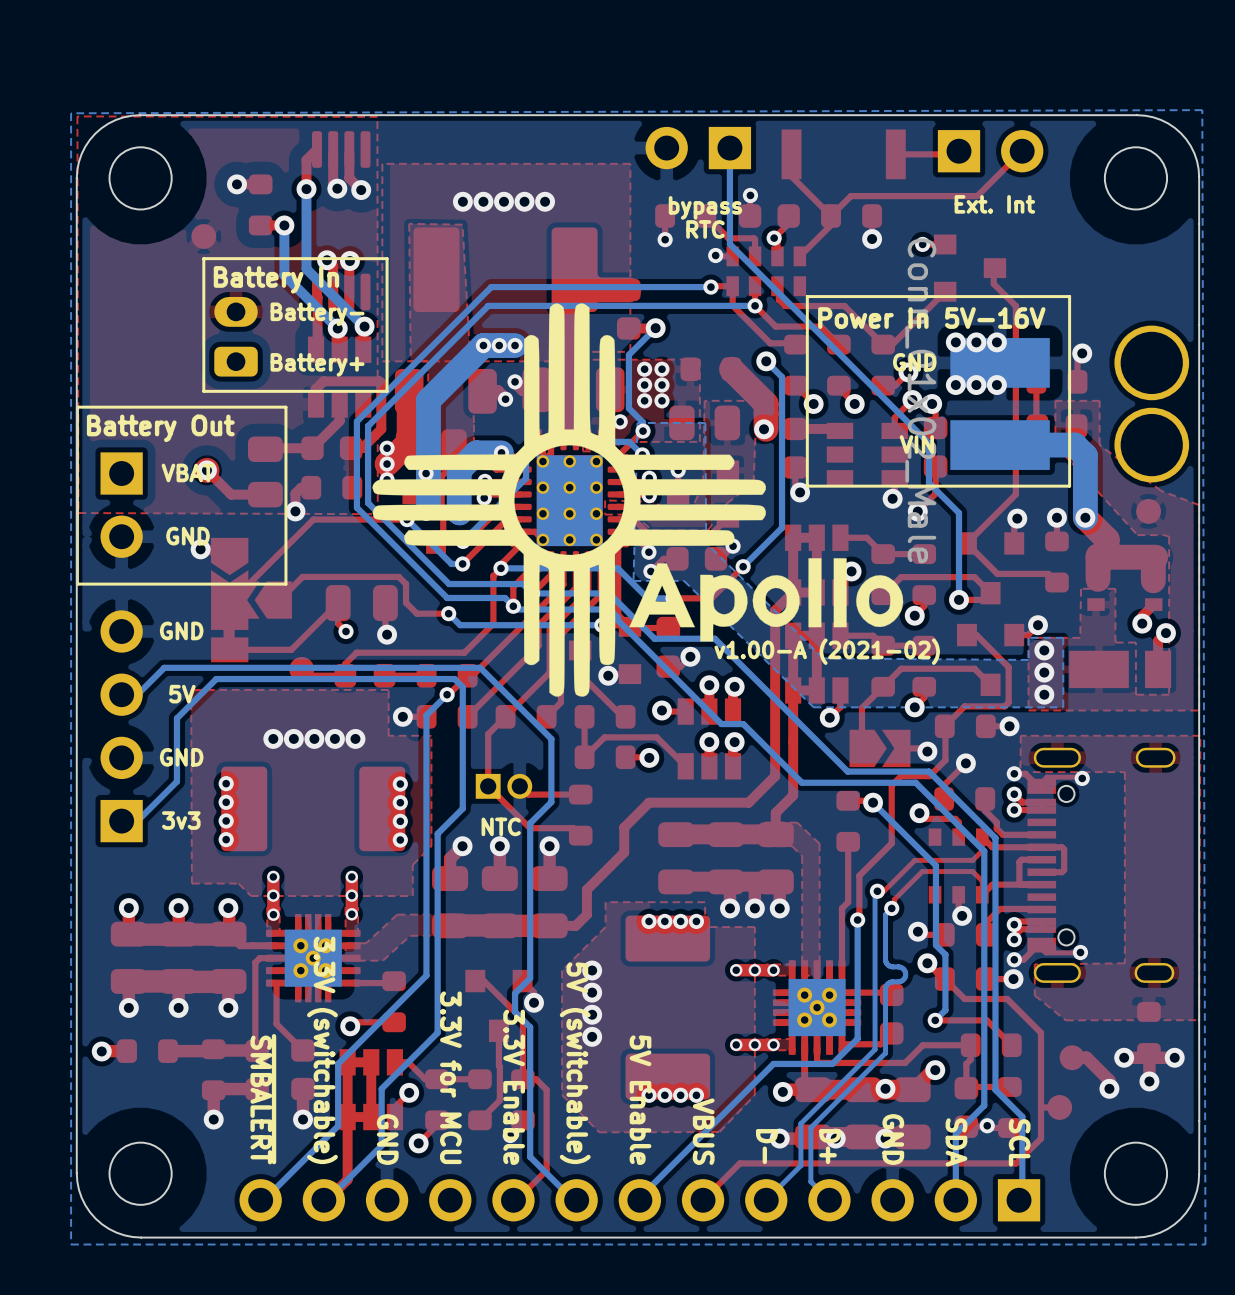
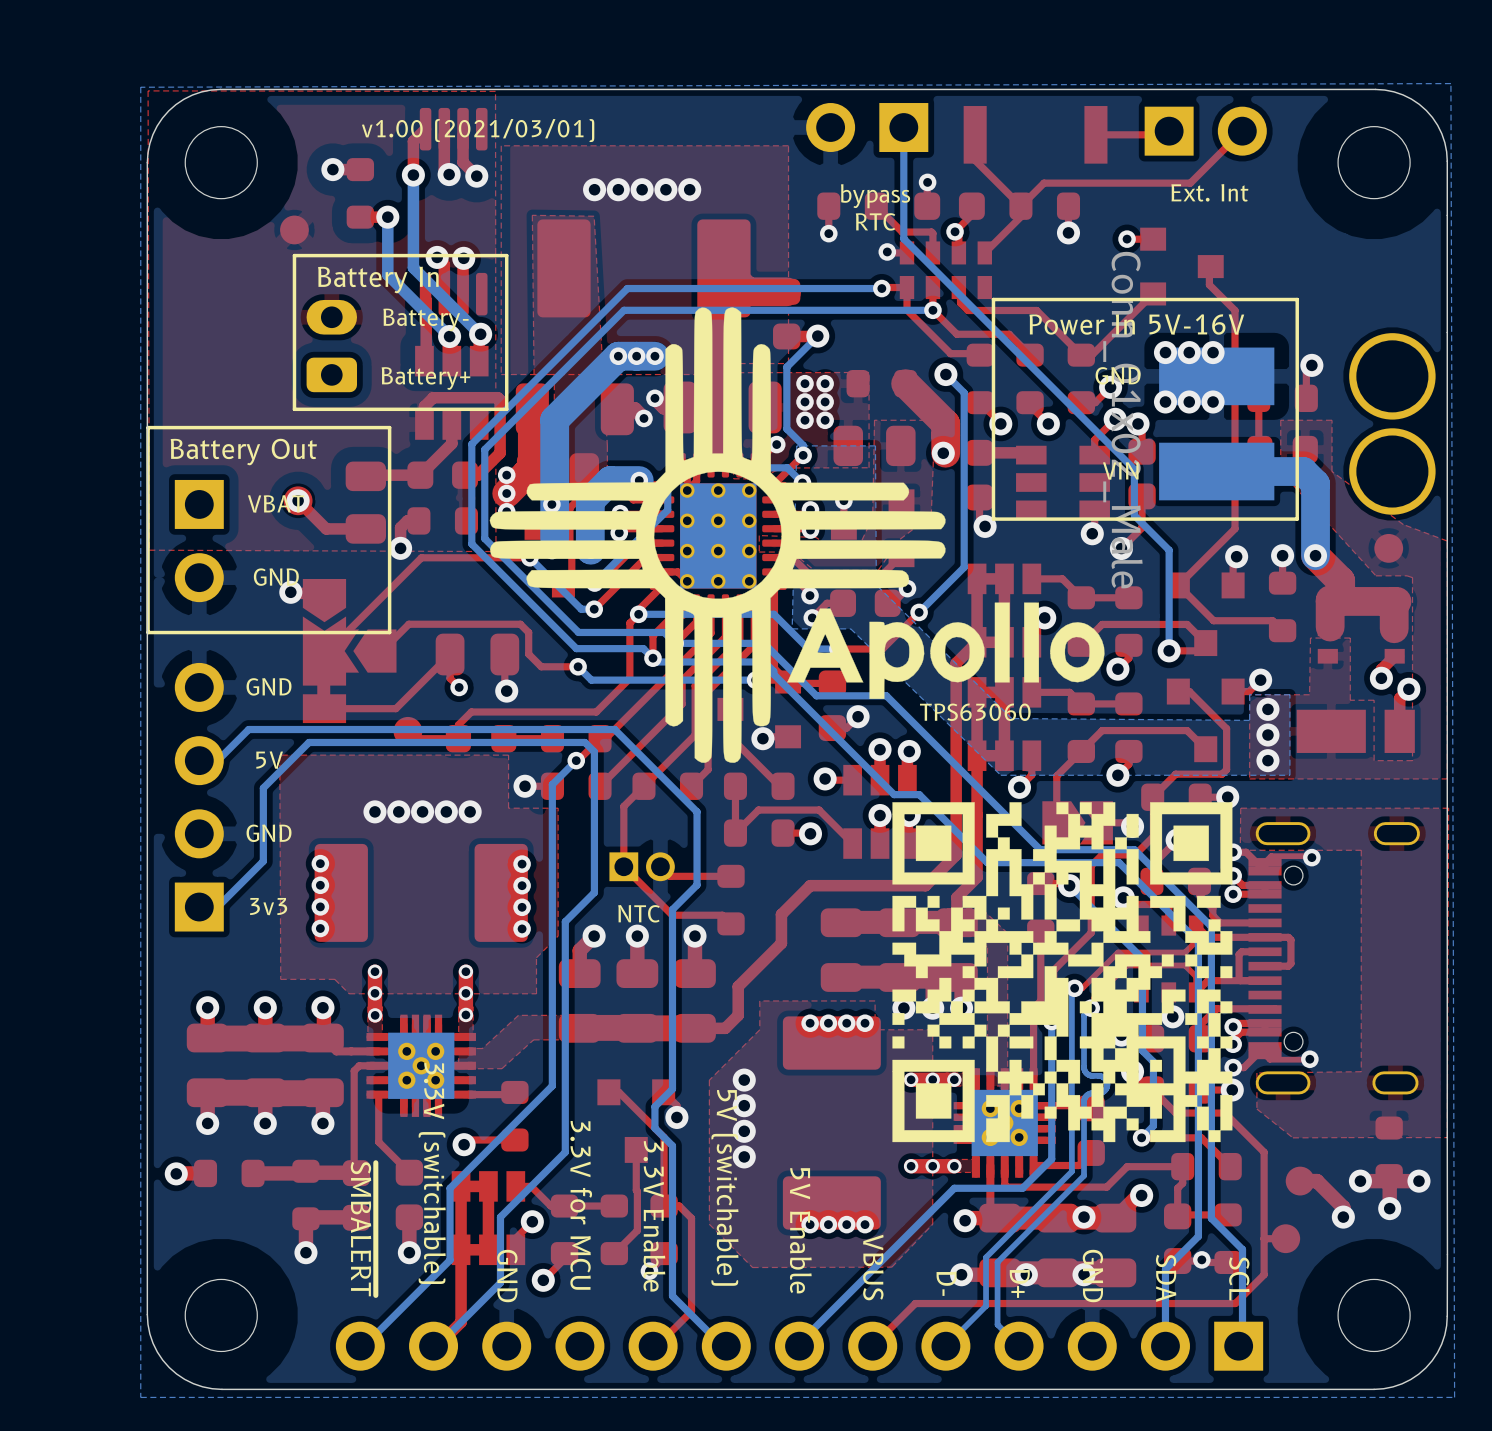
text: none -> v1.00 (2021/03/01) (478, 130)
text: v1.00-A (2021-02) (827, 651) -> none
text: none -> TPS63060 (975, 712)
drawing: none -> [892, 802, 1233, 1143]

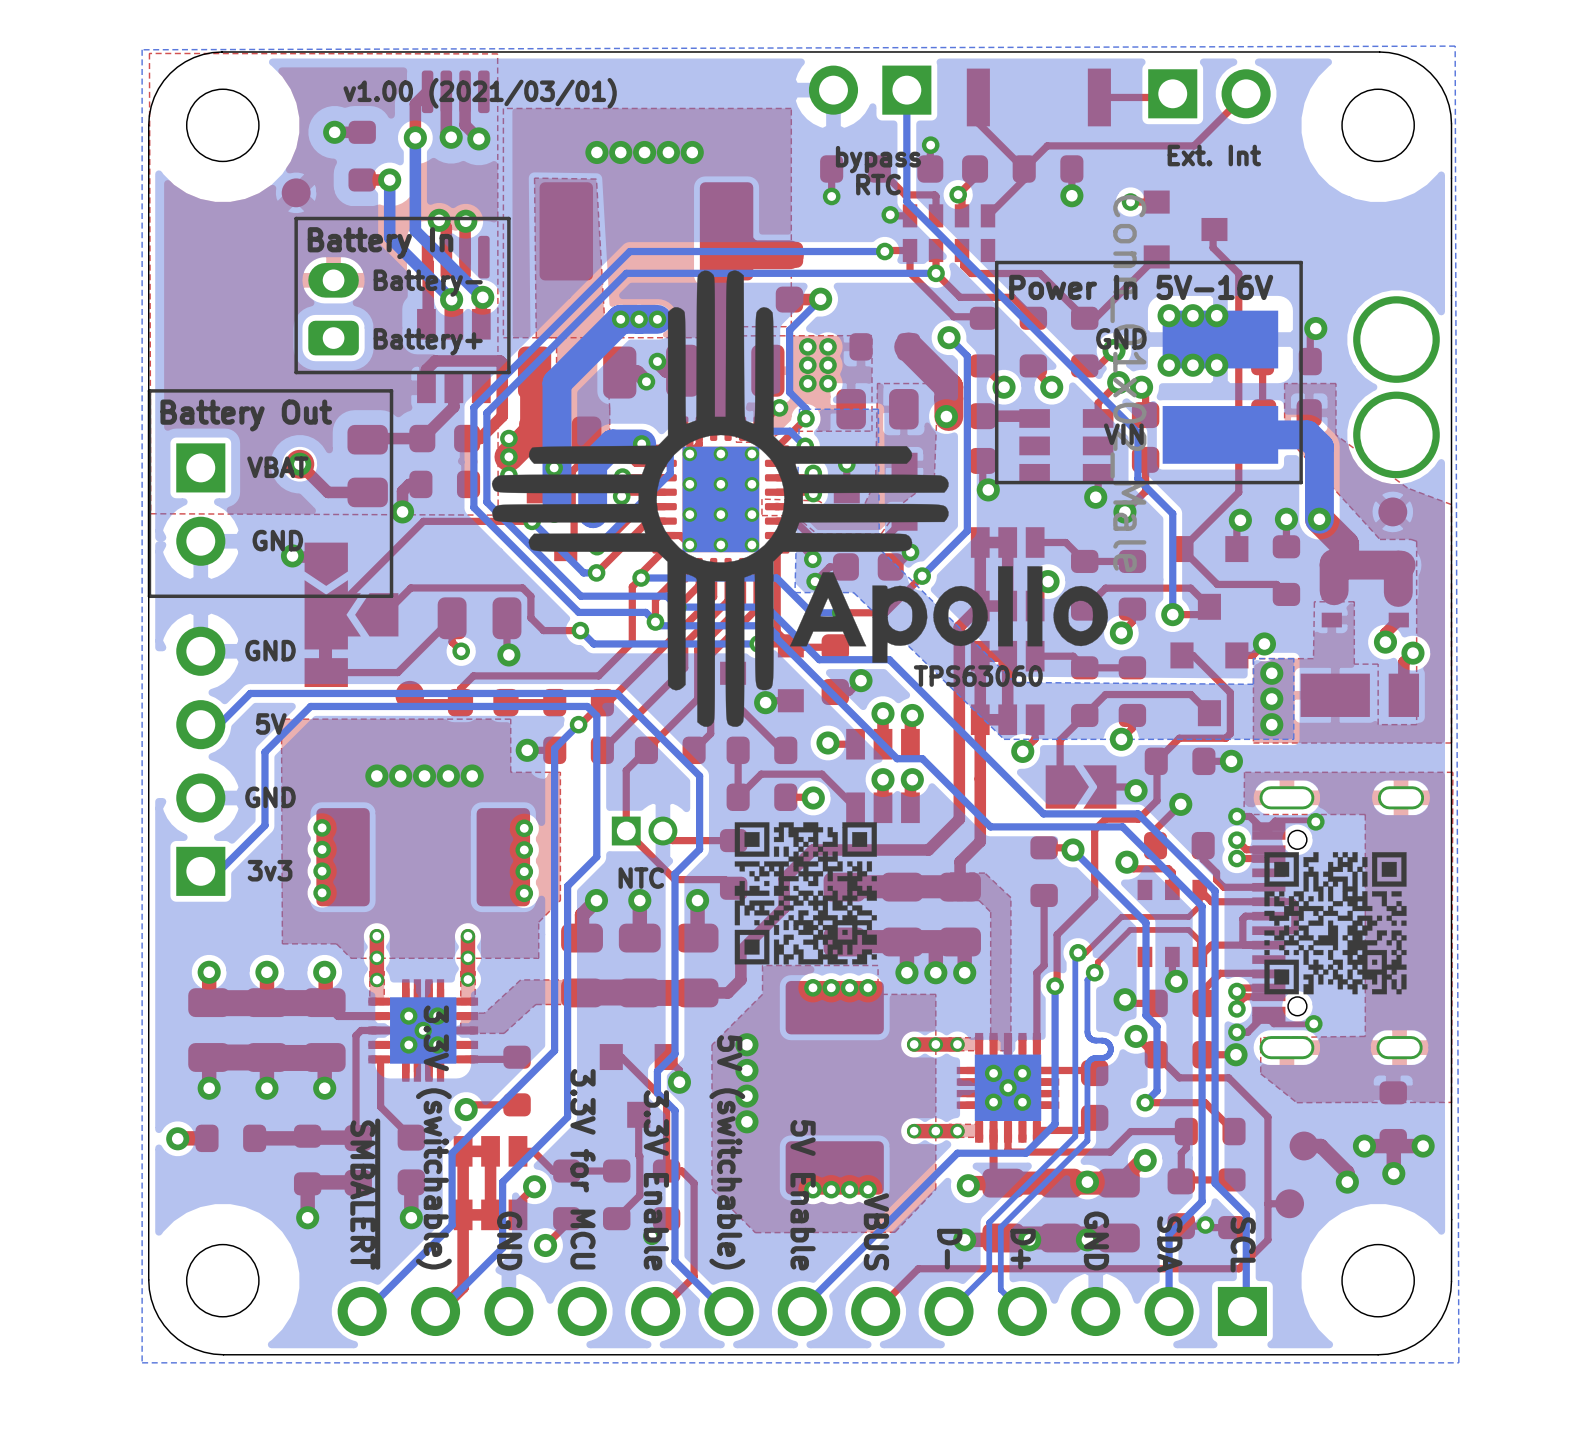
drawing: [892, 802, 1233, 1143] -> none
drawing: none -> [734, 822, 877, 965]
drawing: none -> [1264, 852, 1407, 995]

